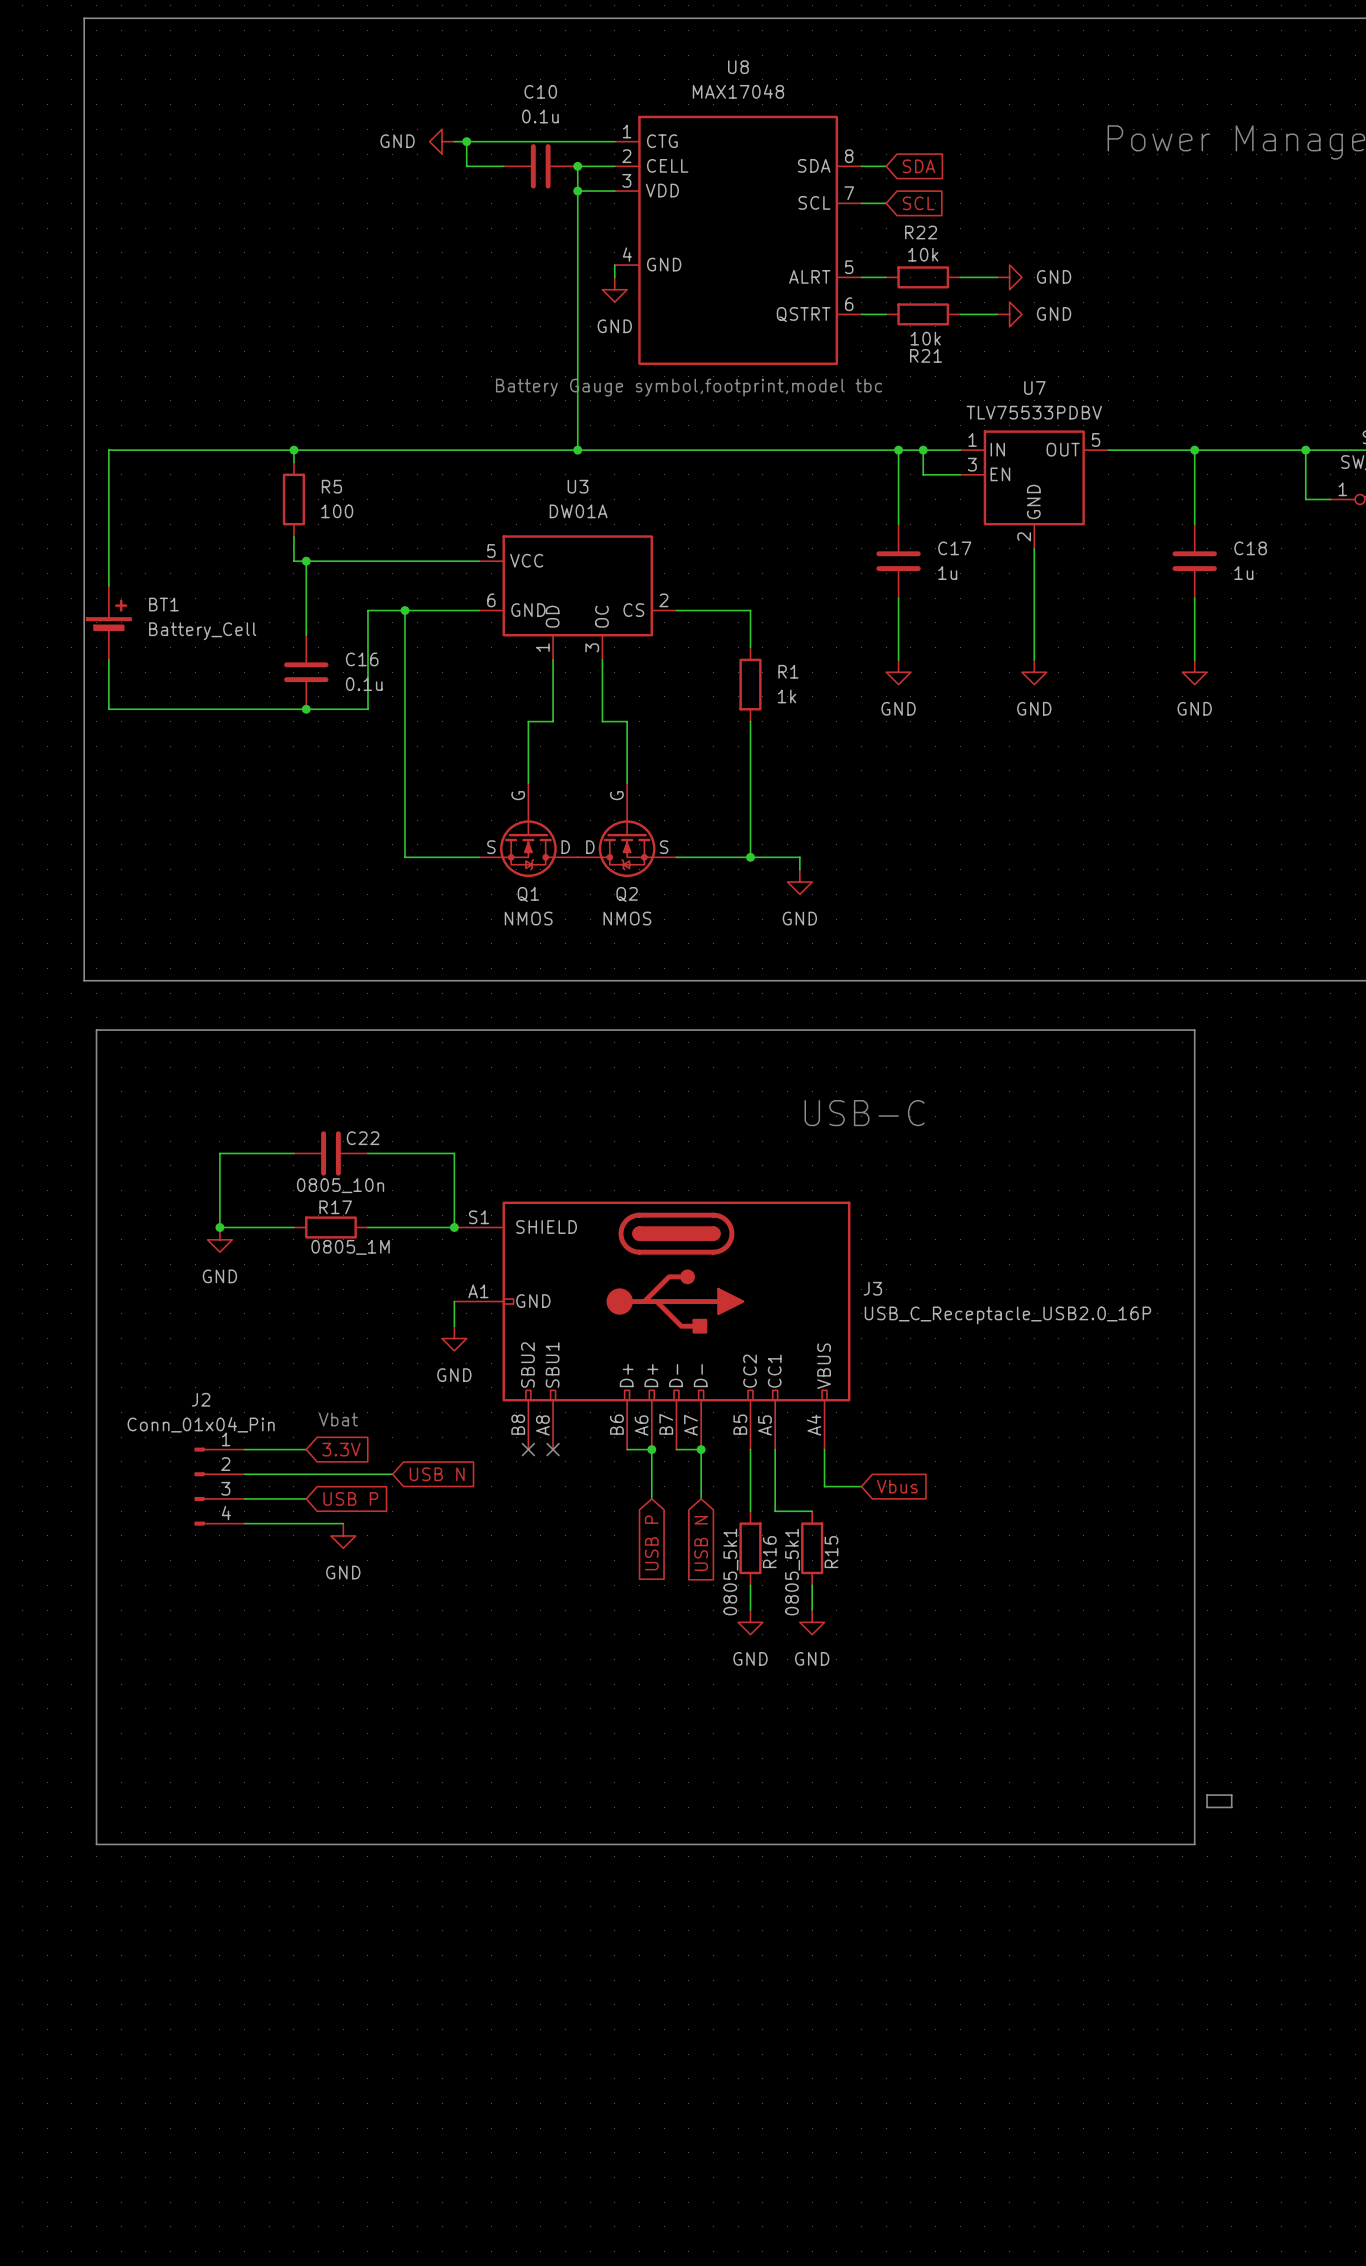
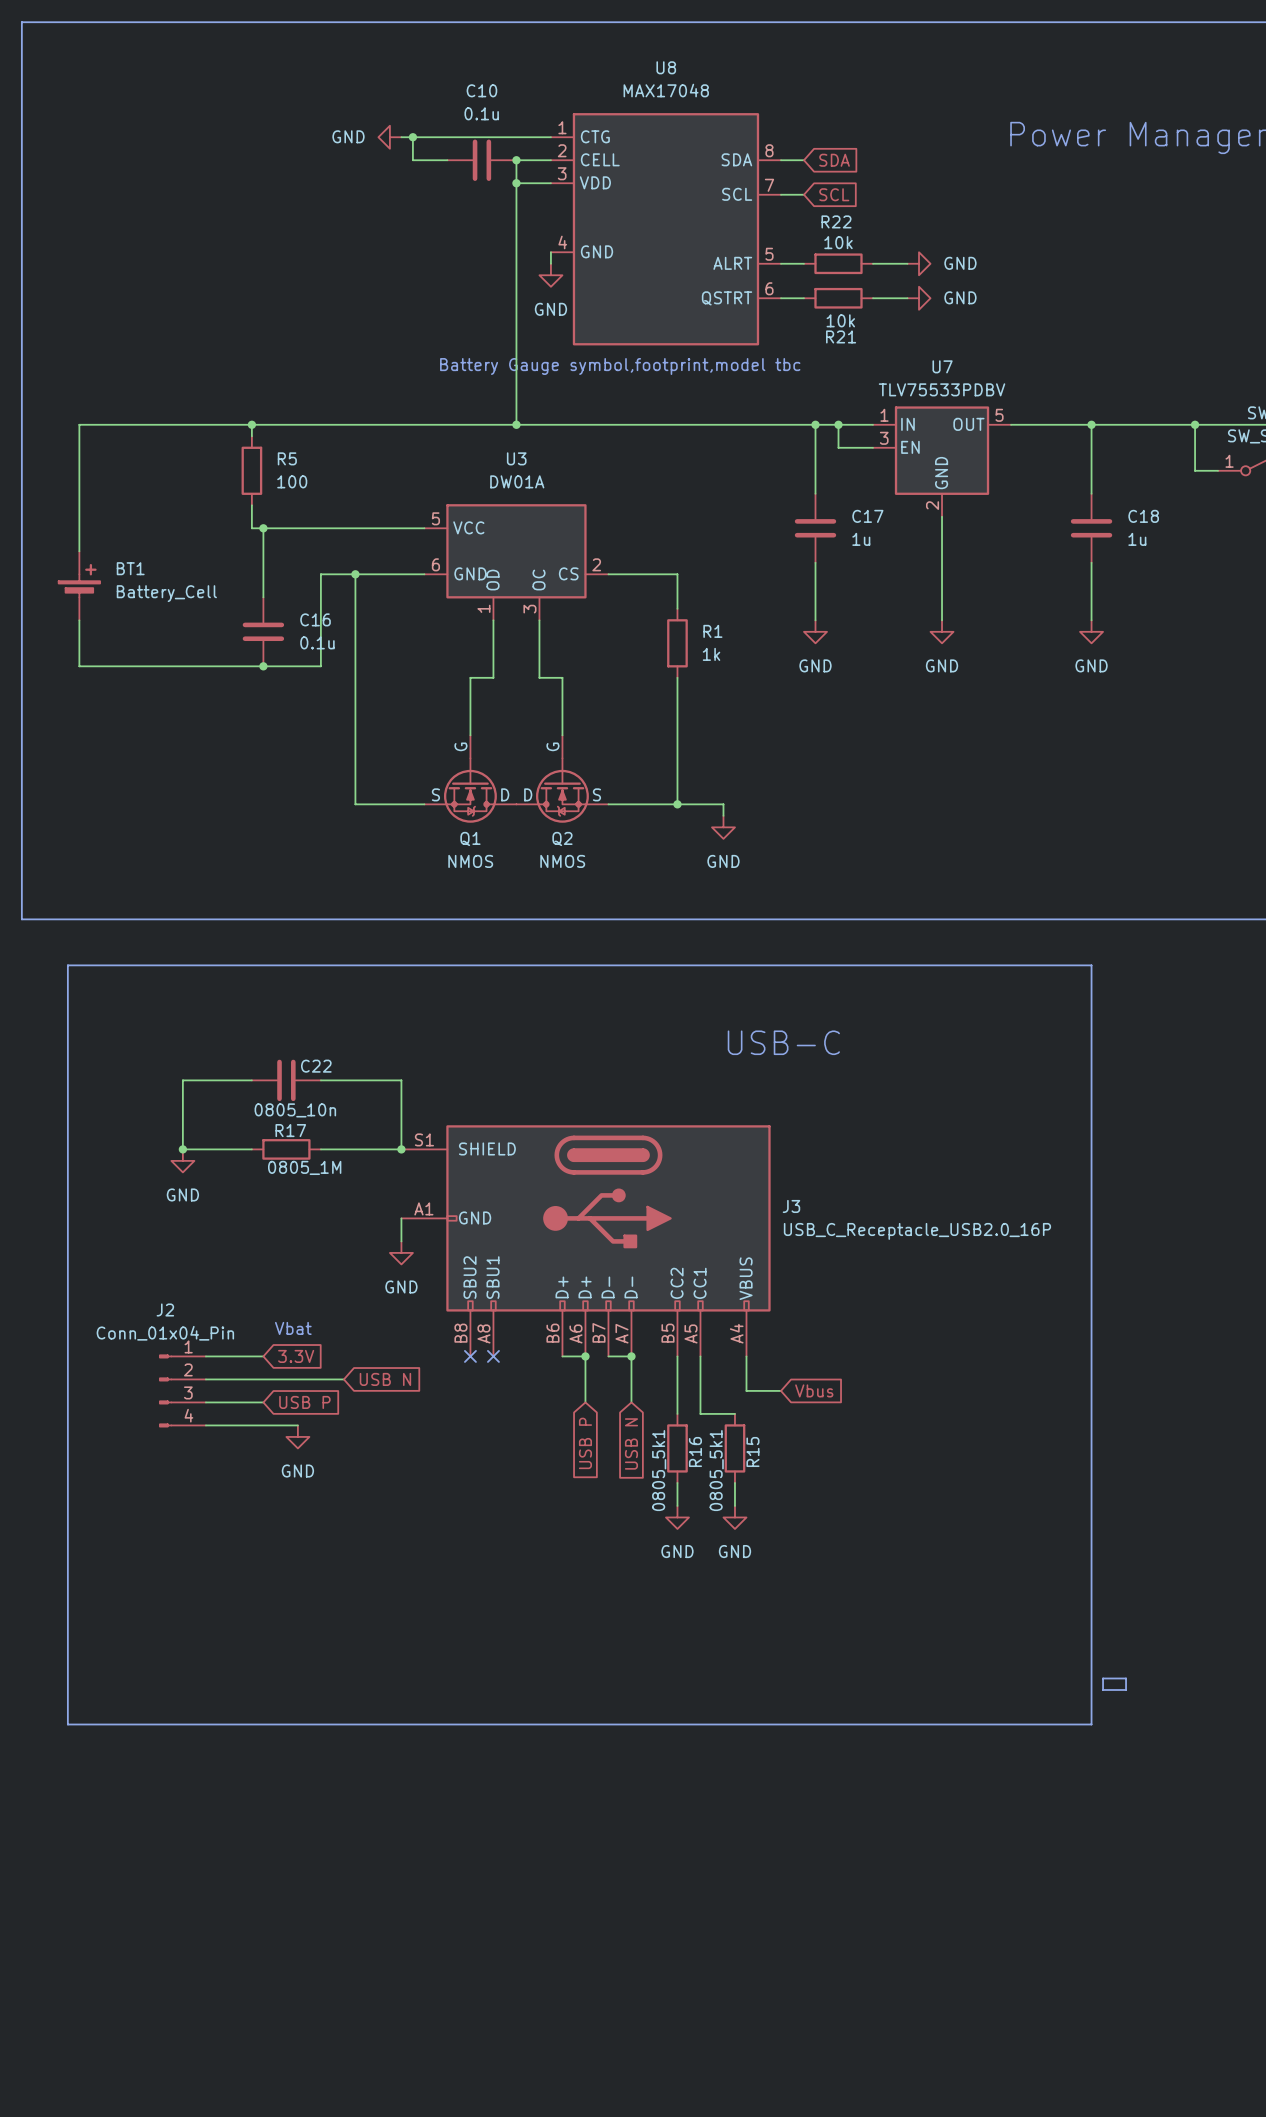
line: (84, 18) (84, 980) -> (56, 22) (21, 22) (21, 919) (56, 919)

